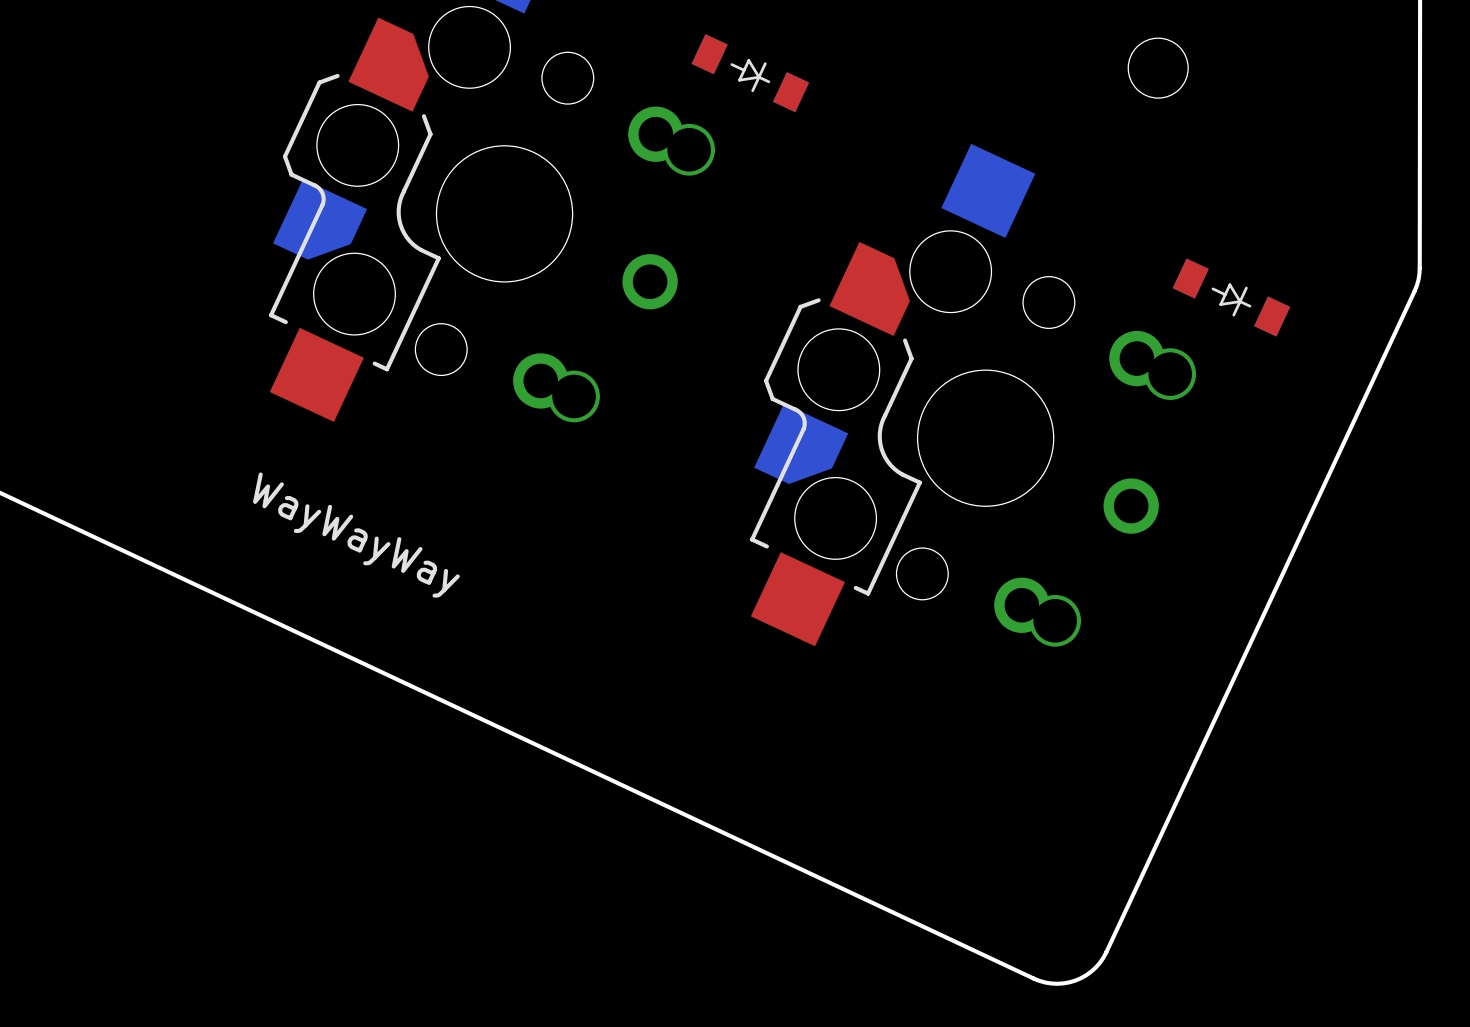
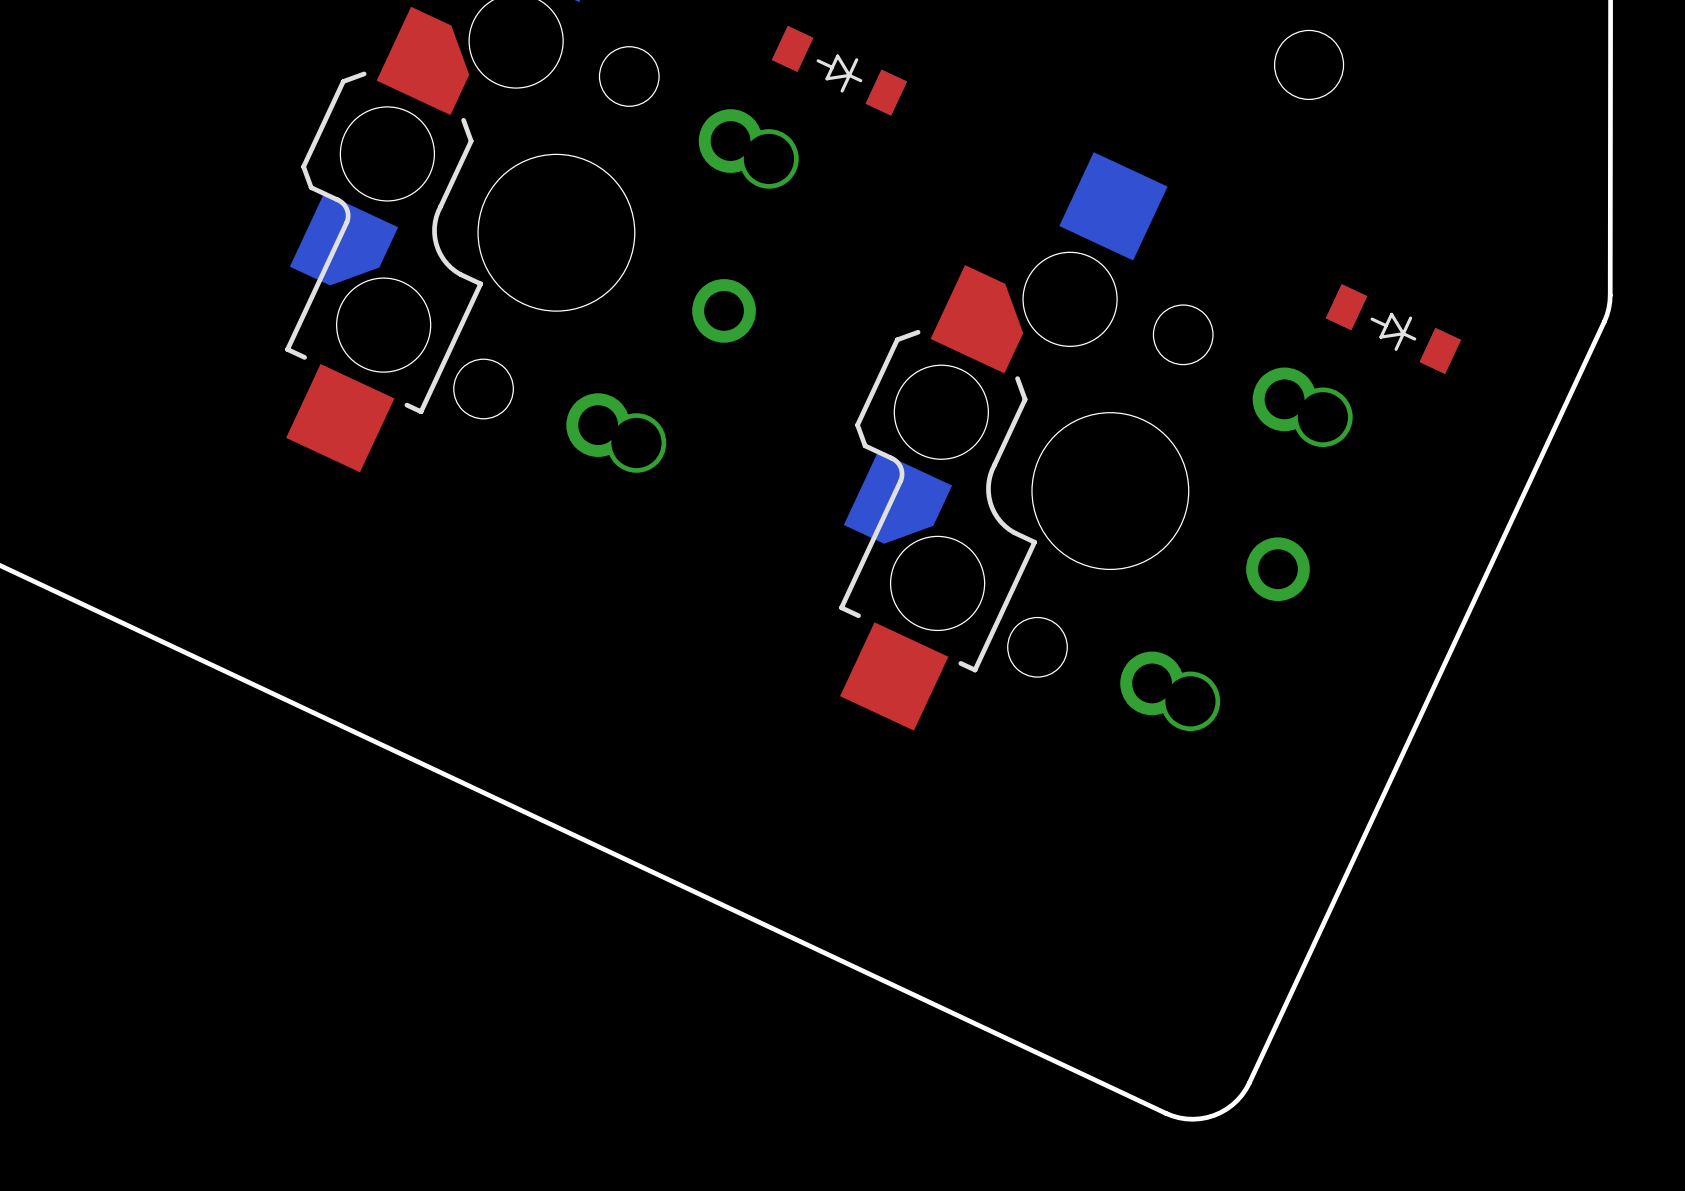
text: WayWayWay (356, 535) -> none

